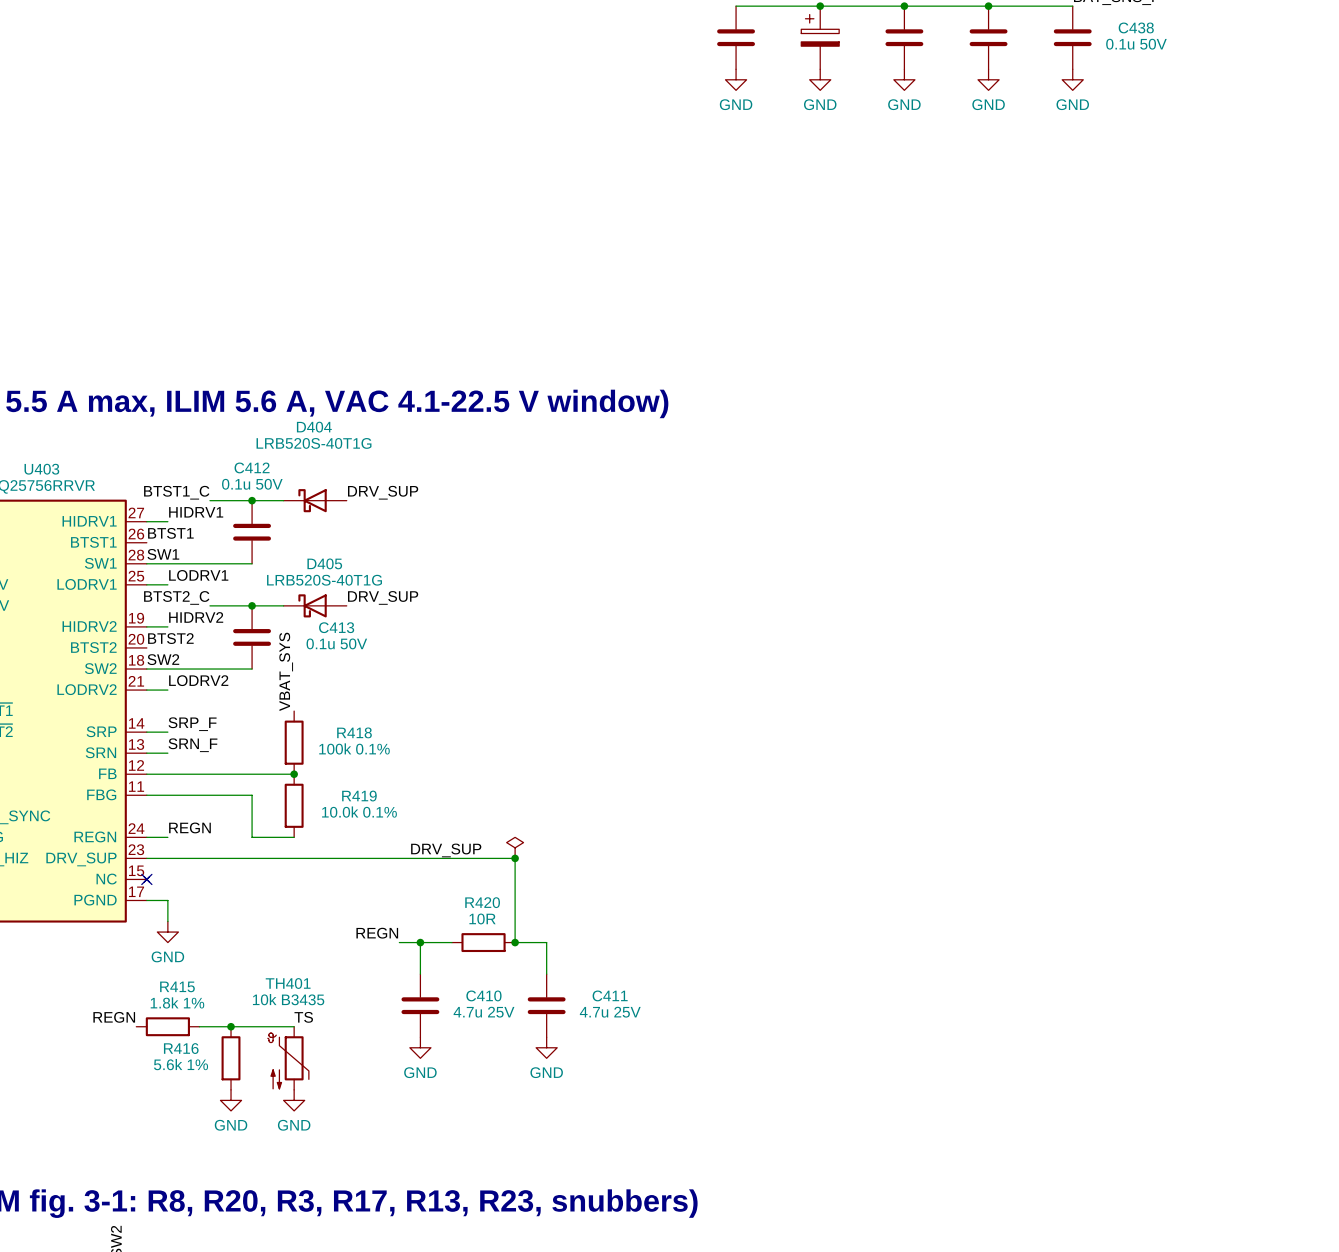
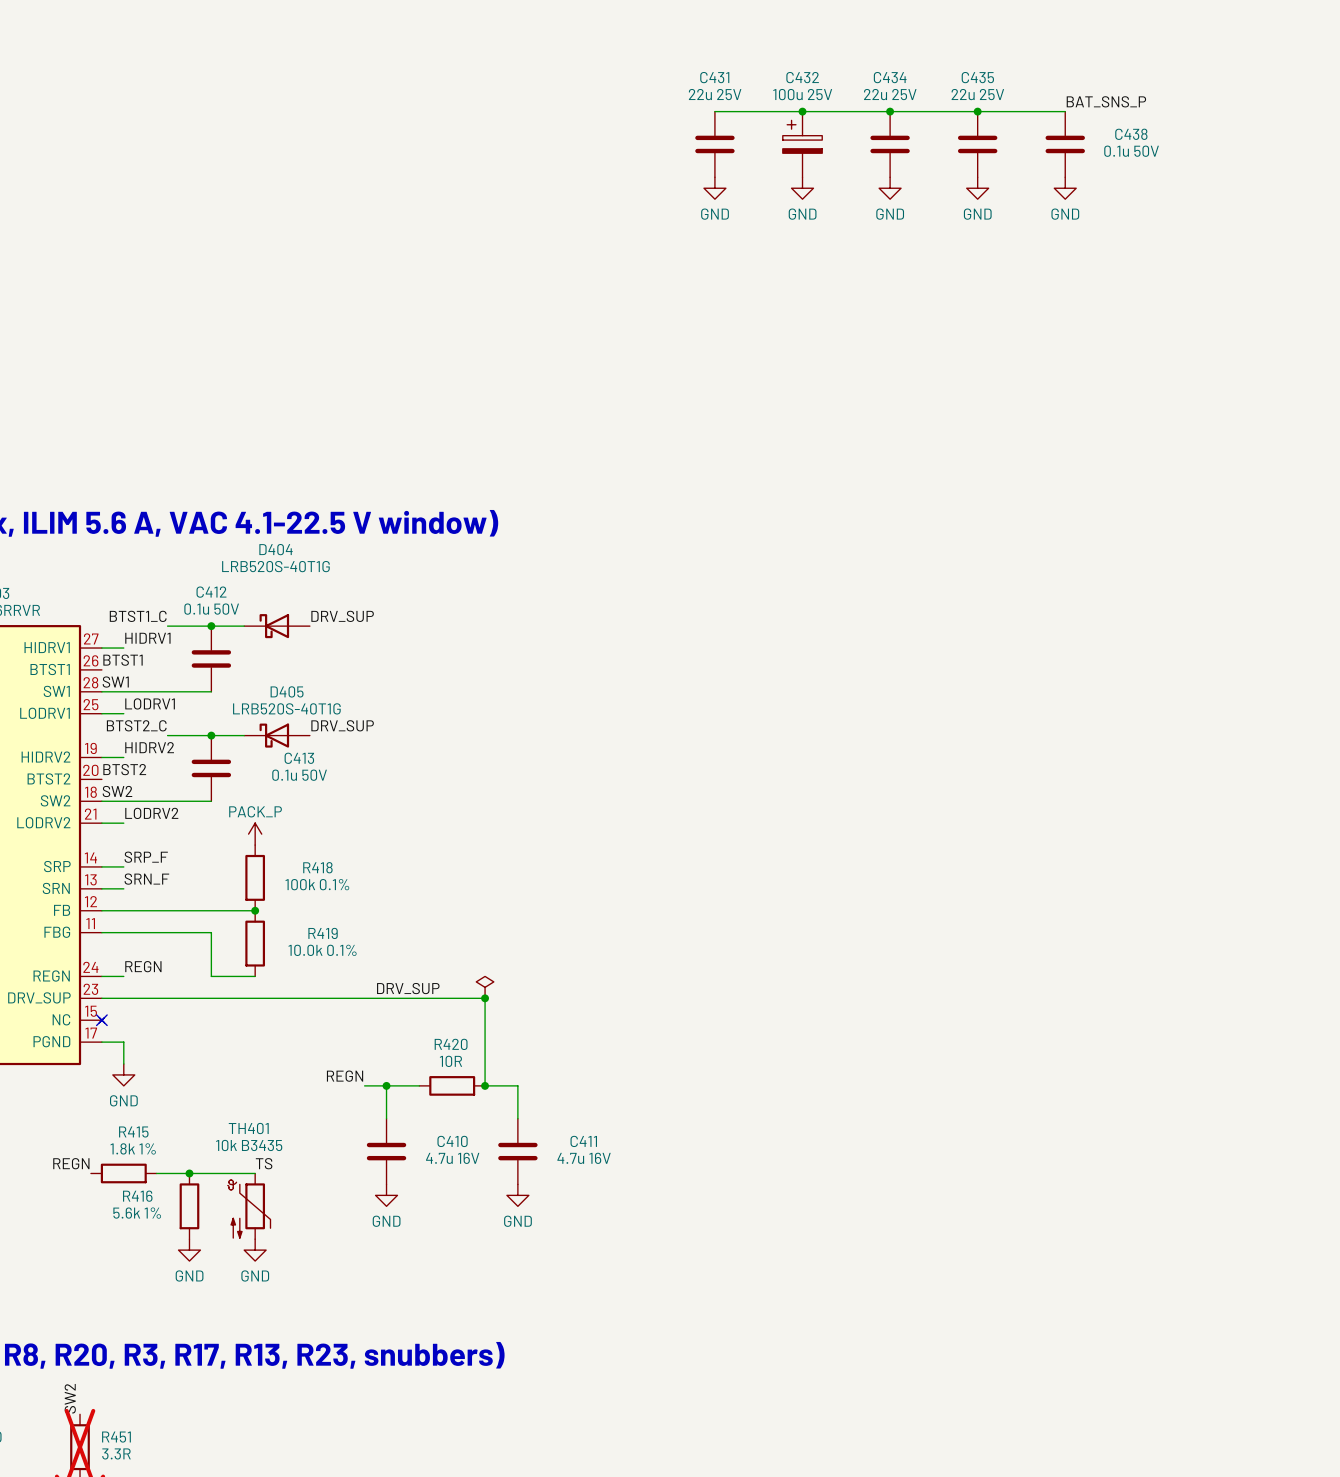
label: VBAT_SYS (286, 671) -> none
power symbol: none -> PACK_P (255, 834)
C410 value: 4.7u 25V (484, 1012) -> 4.7u 16V (452, 1158)
C411 value: 4.7u 25V (610, 1012) -> 4.7u 16V (584, 1158)

